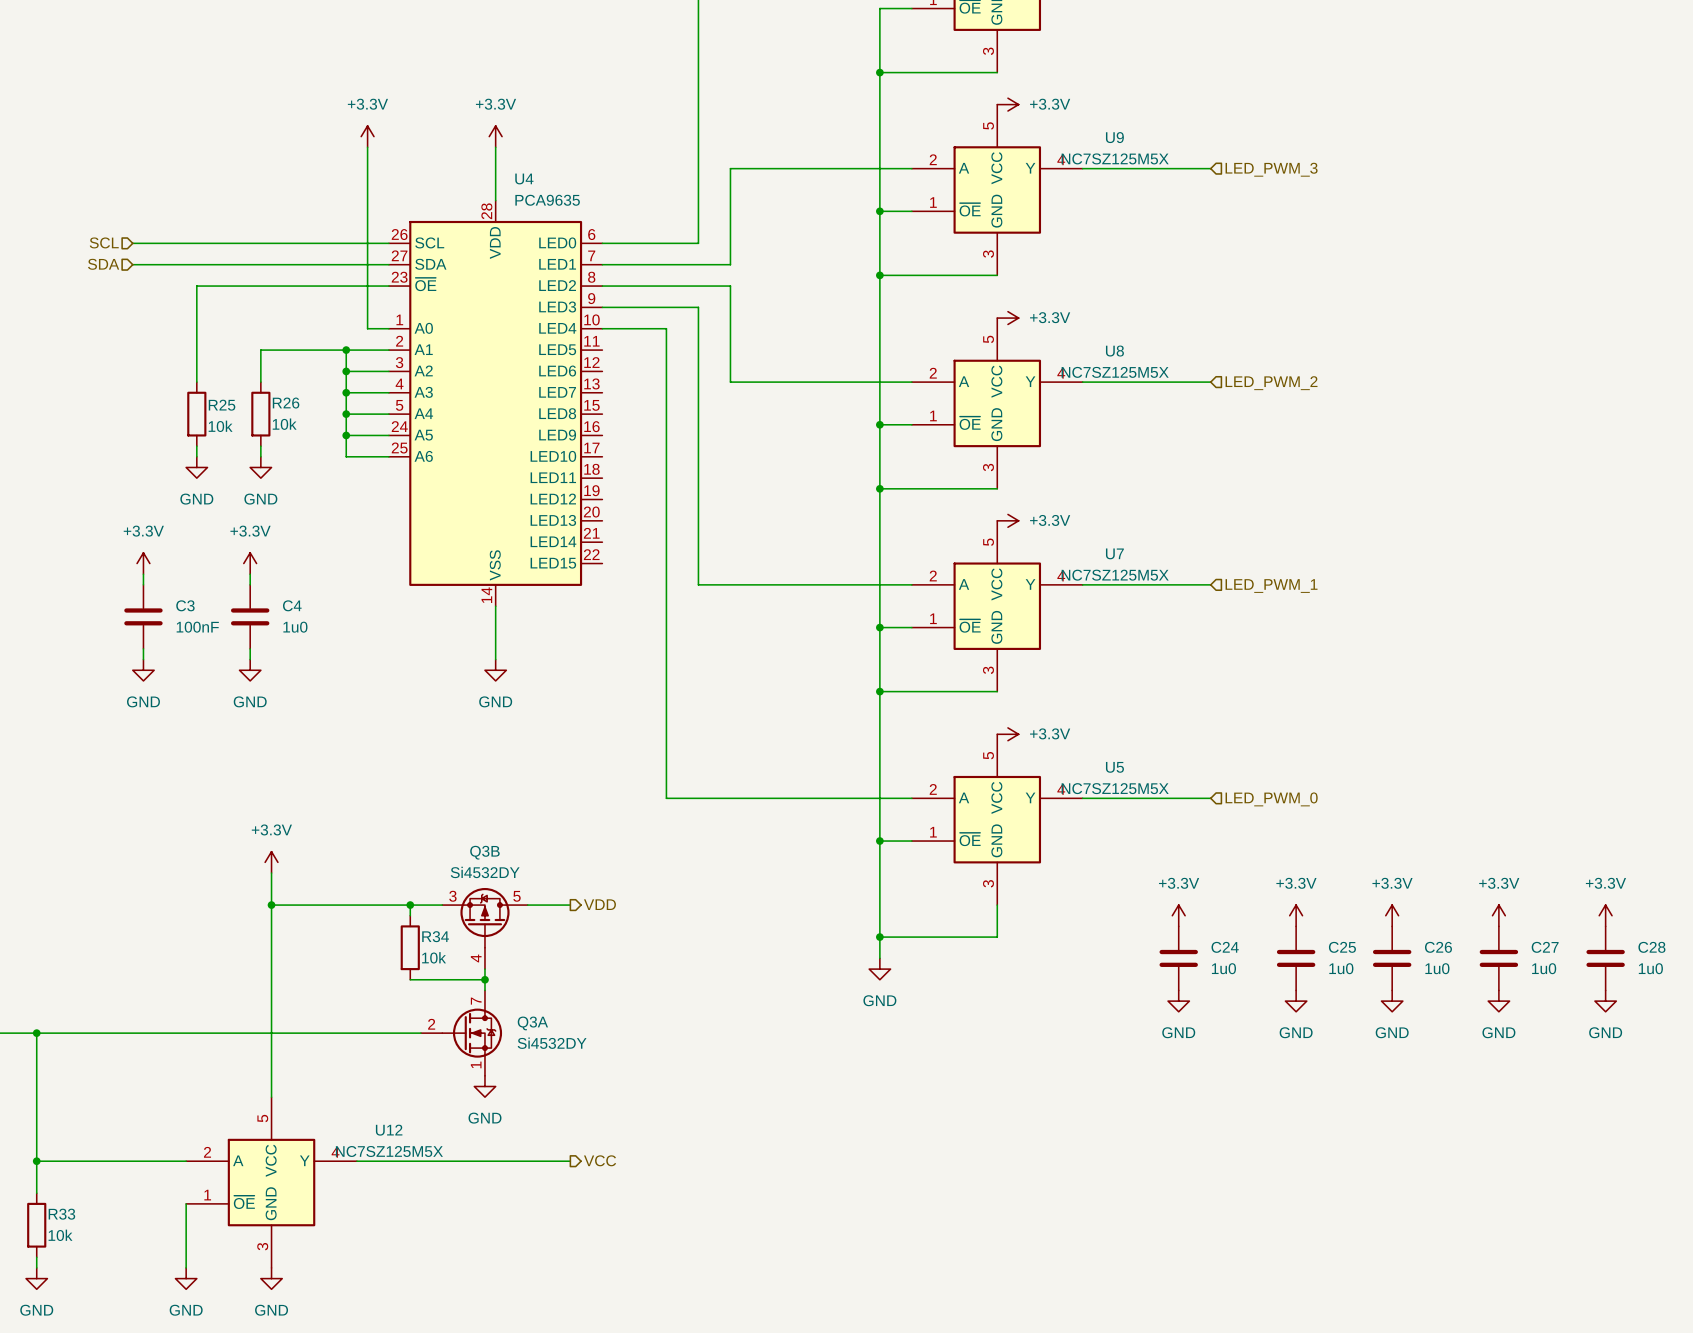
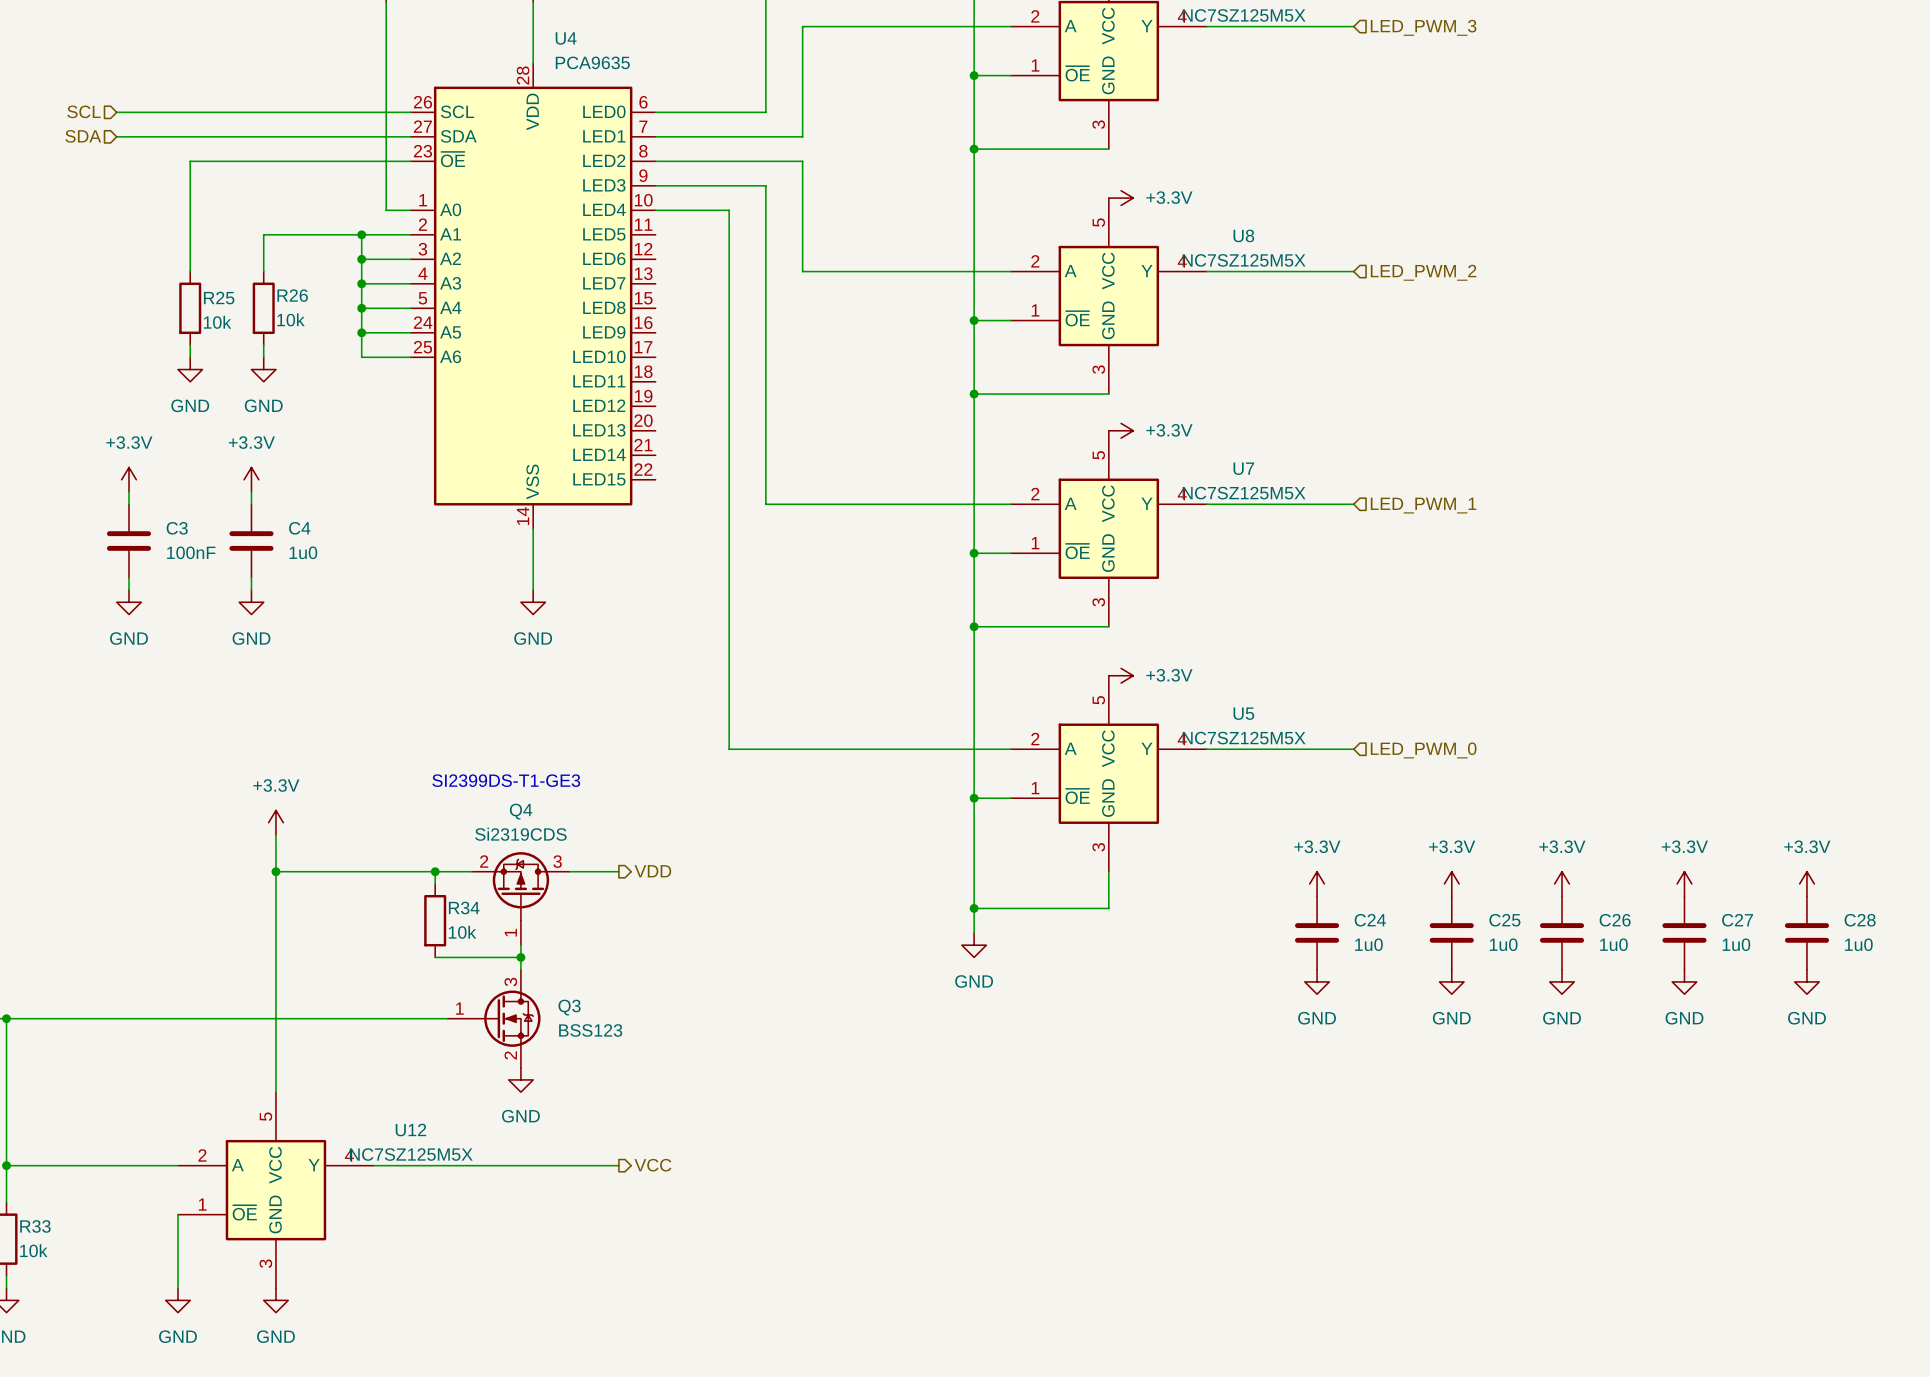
text: none -> SI2399DS-T1-GE3 (506, 780)
Q3B name: Q3B (484, 852) -> Q4 (521, 811)
Q3B value: Si4532DY (485, 872) -> Si2319CDS (520, 834)
Q3B pin number: 3 (452, 896) -> 2 (484, 861)
Q3B pin number: 5 (516, 896) -> 3 (557, 861)
Q3B pin number: 4 (476, 958) -> 1 (510, 932)
Q3A pin number: 7 (476, 1001) -> 3 (510, 982)
Q3A name: Q3A (532, 1023) -> Q3 (569, 1007)
Q3A pin number: 2 (431, 1024) -> 1 (459, 1008)
Q3A value: Si4532DY (552, 1043) -> BSS123 (590, 1030)
Q3A pin number: 1 (476, 1064) -> 2 (510, 1055)

